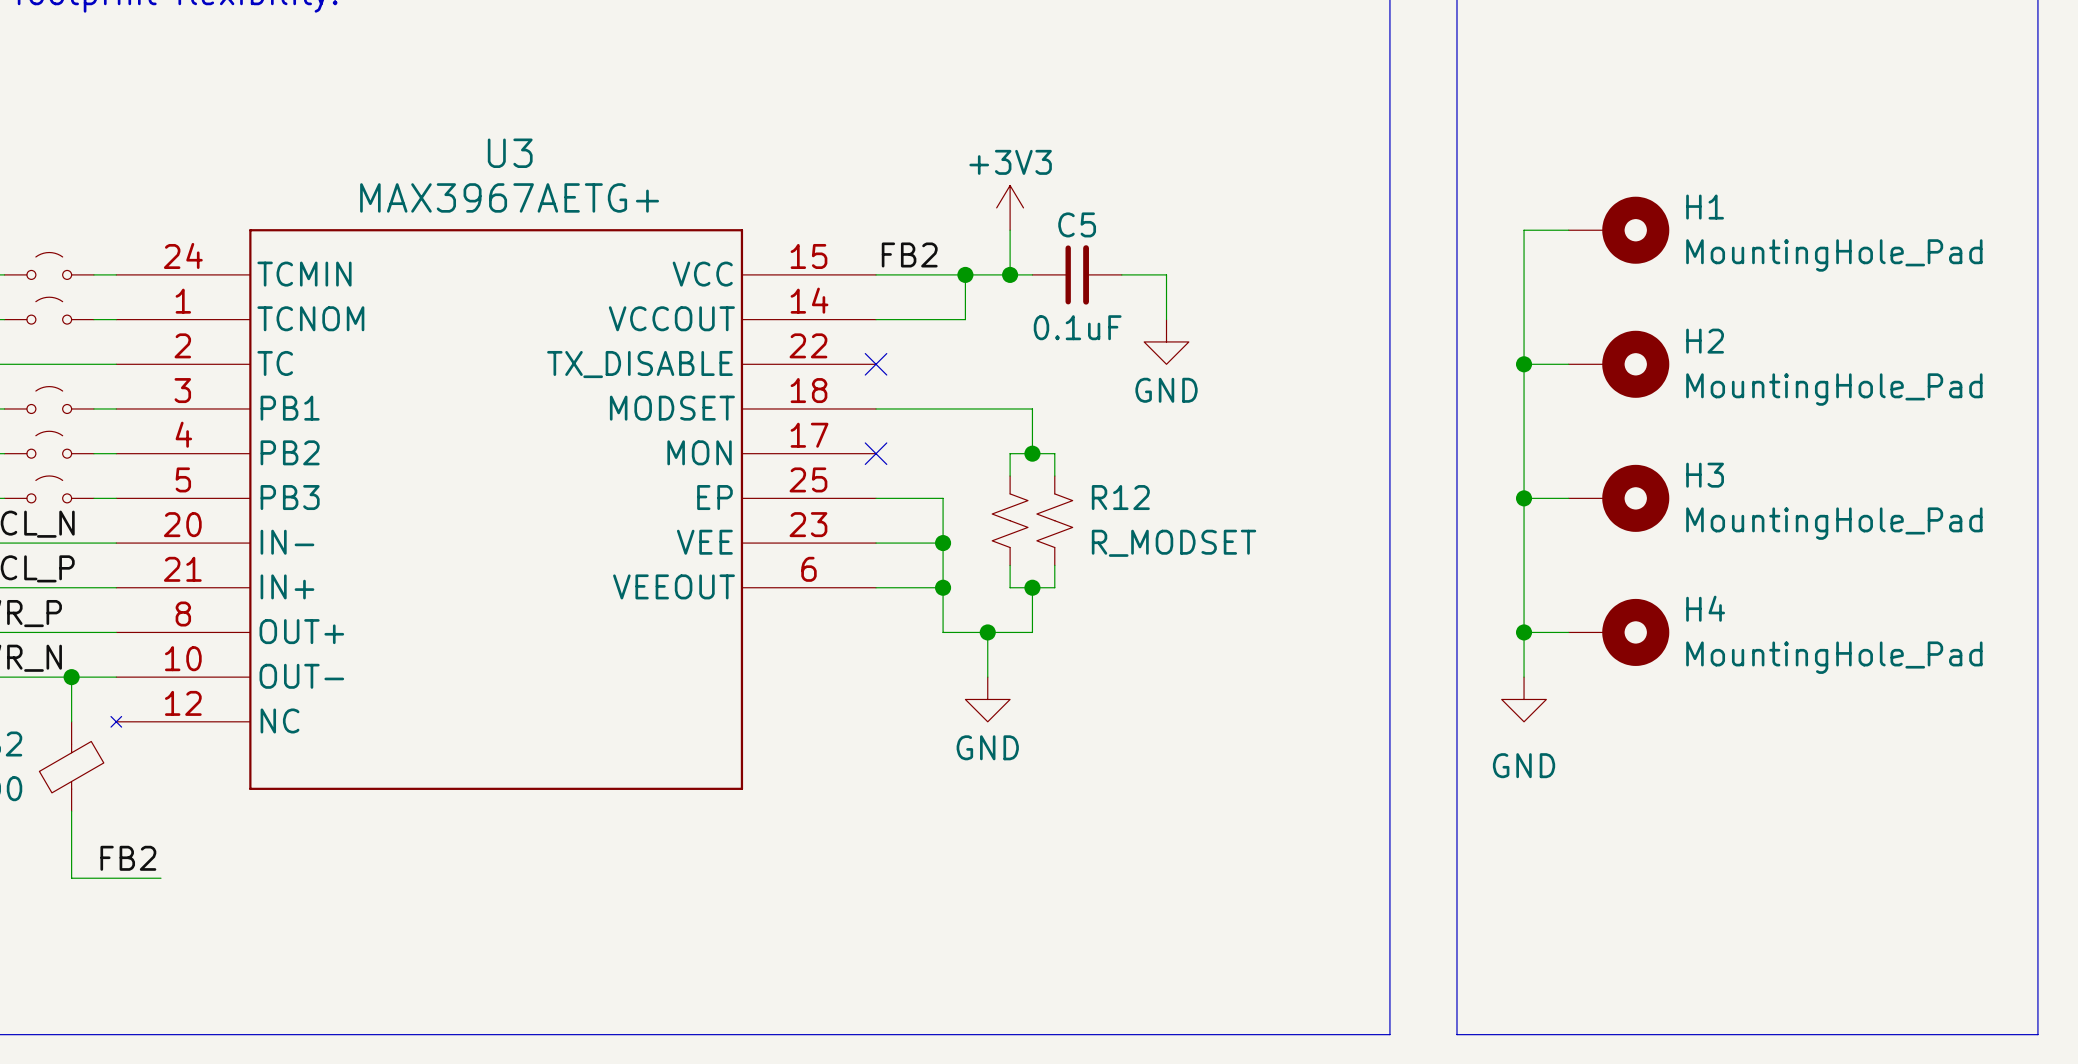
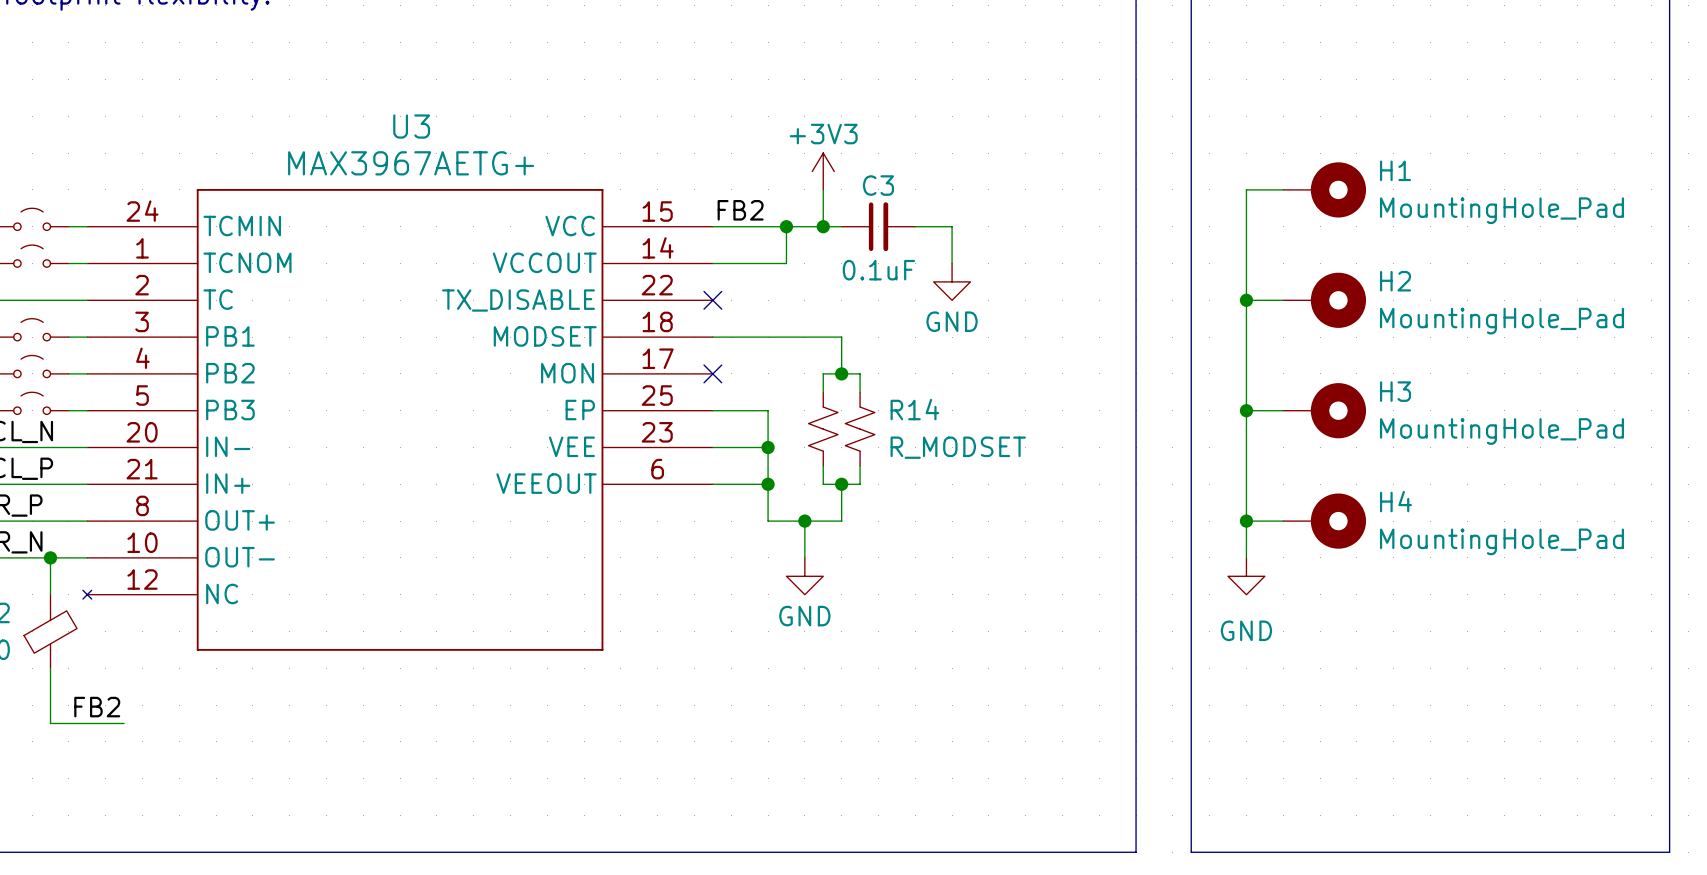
C5 name: C5 (1077, 224) -> C3 (878, 185)
R12 name: R12 (1120, 497) -> R14 (914, 409)

